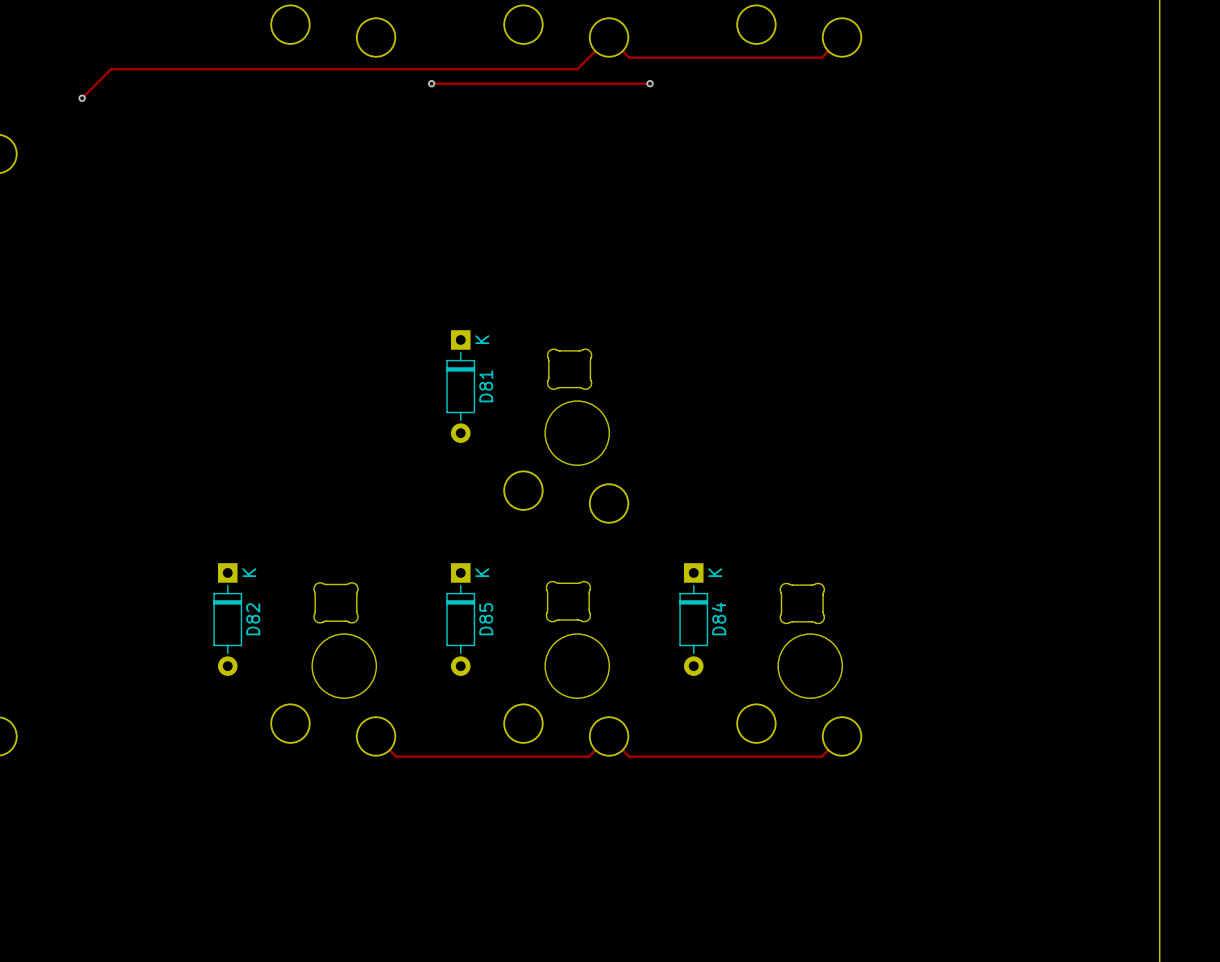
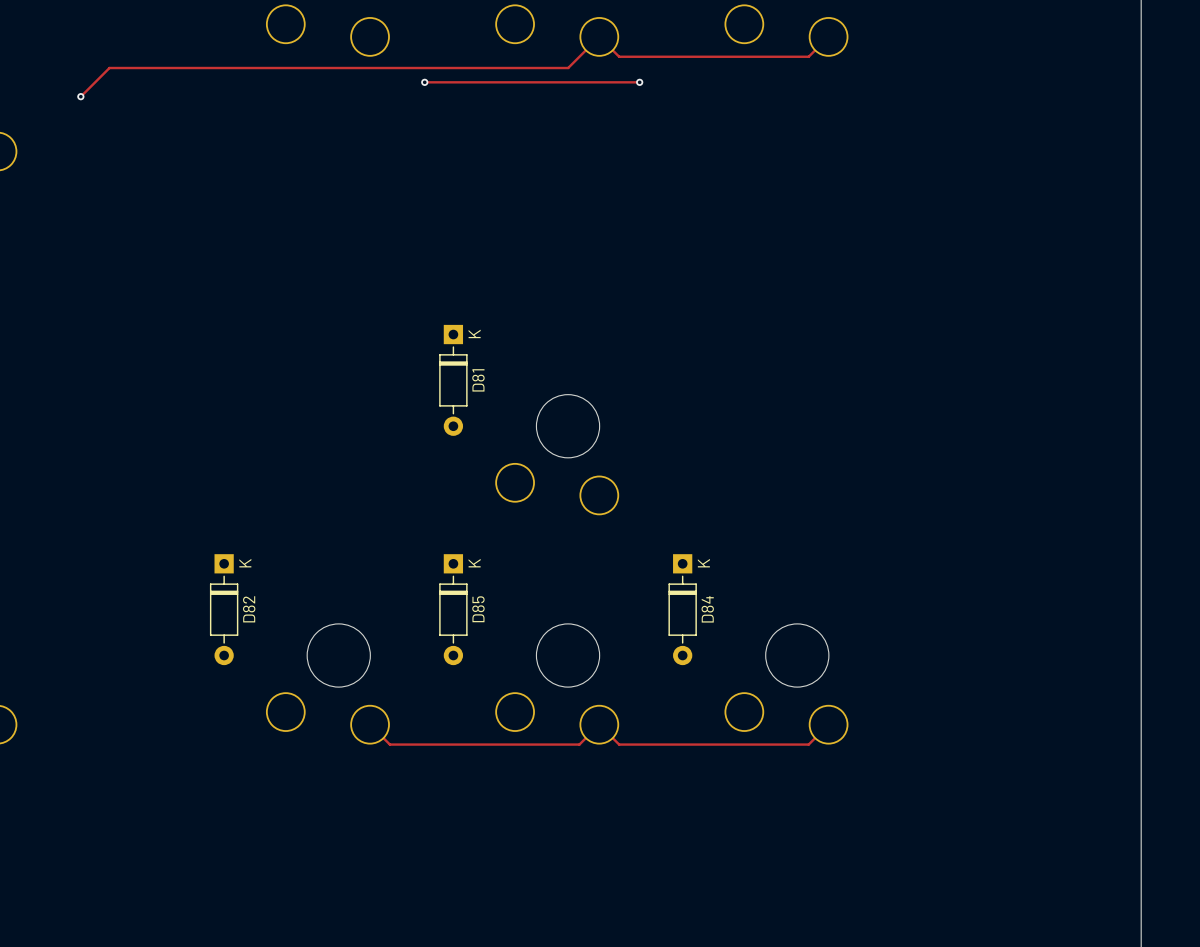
part: (569, 369) -> none
part: (568, 601) -> none
part: (336, 602) -> none
part: (802, 603) -> none

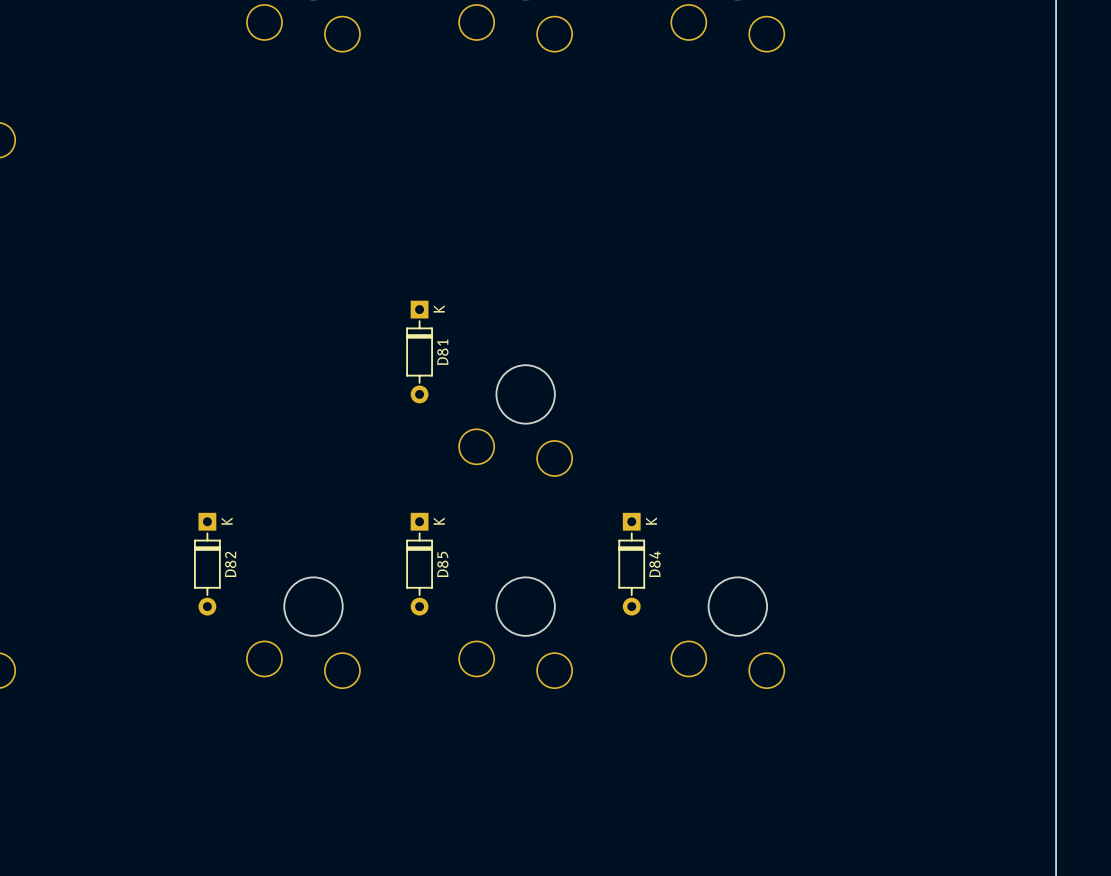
track: (828, 36) (808, 56) (619, 56) (599, 36) (568, 68) (109, 68) (80, 96) -> none
track: (424, 82) (639, 82) -> none
via: (424, 82) -> none
via: (639, 82) -> none
via: (80, 96) -> none
track: (370, 724) (389, 744) (579, 744) (599, 724) (619, 744) (808, 744) (828, 724) -> none

